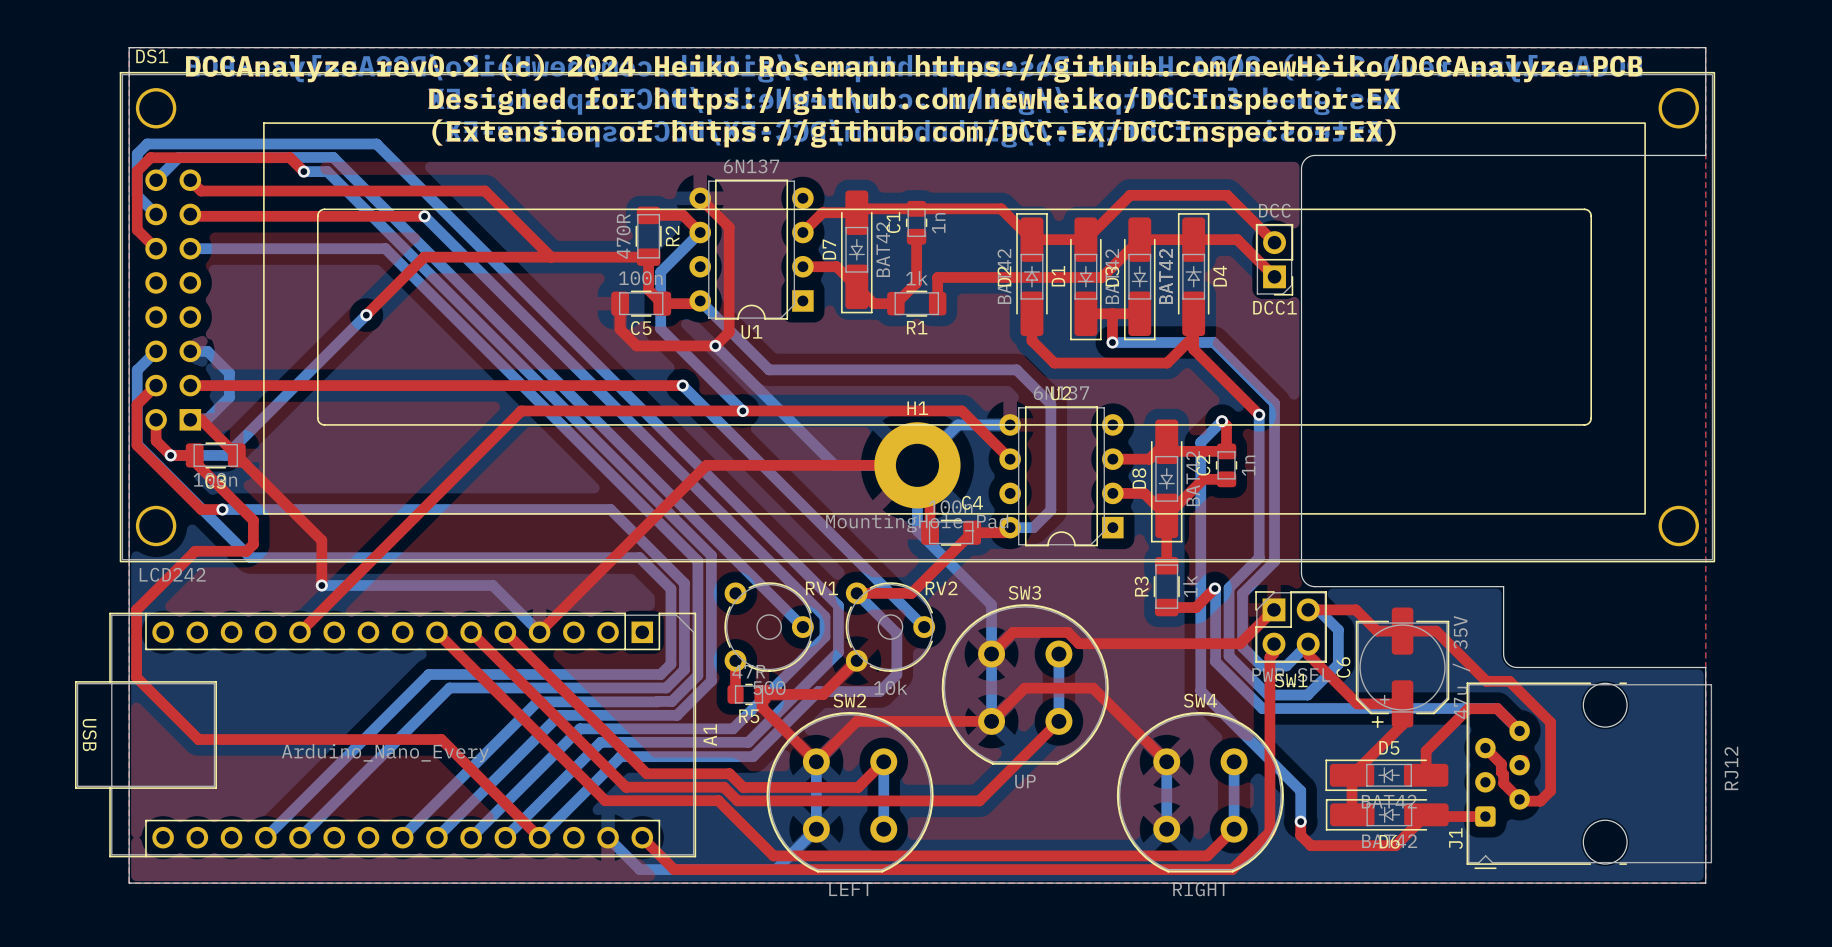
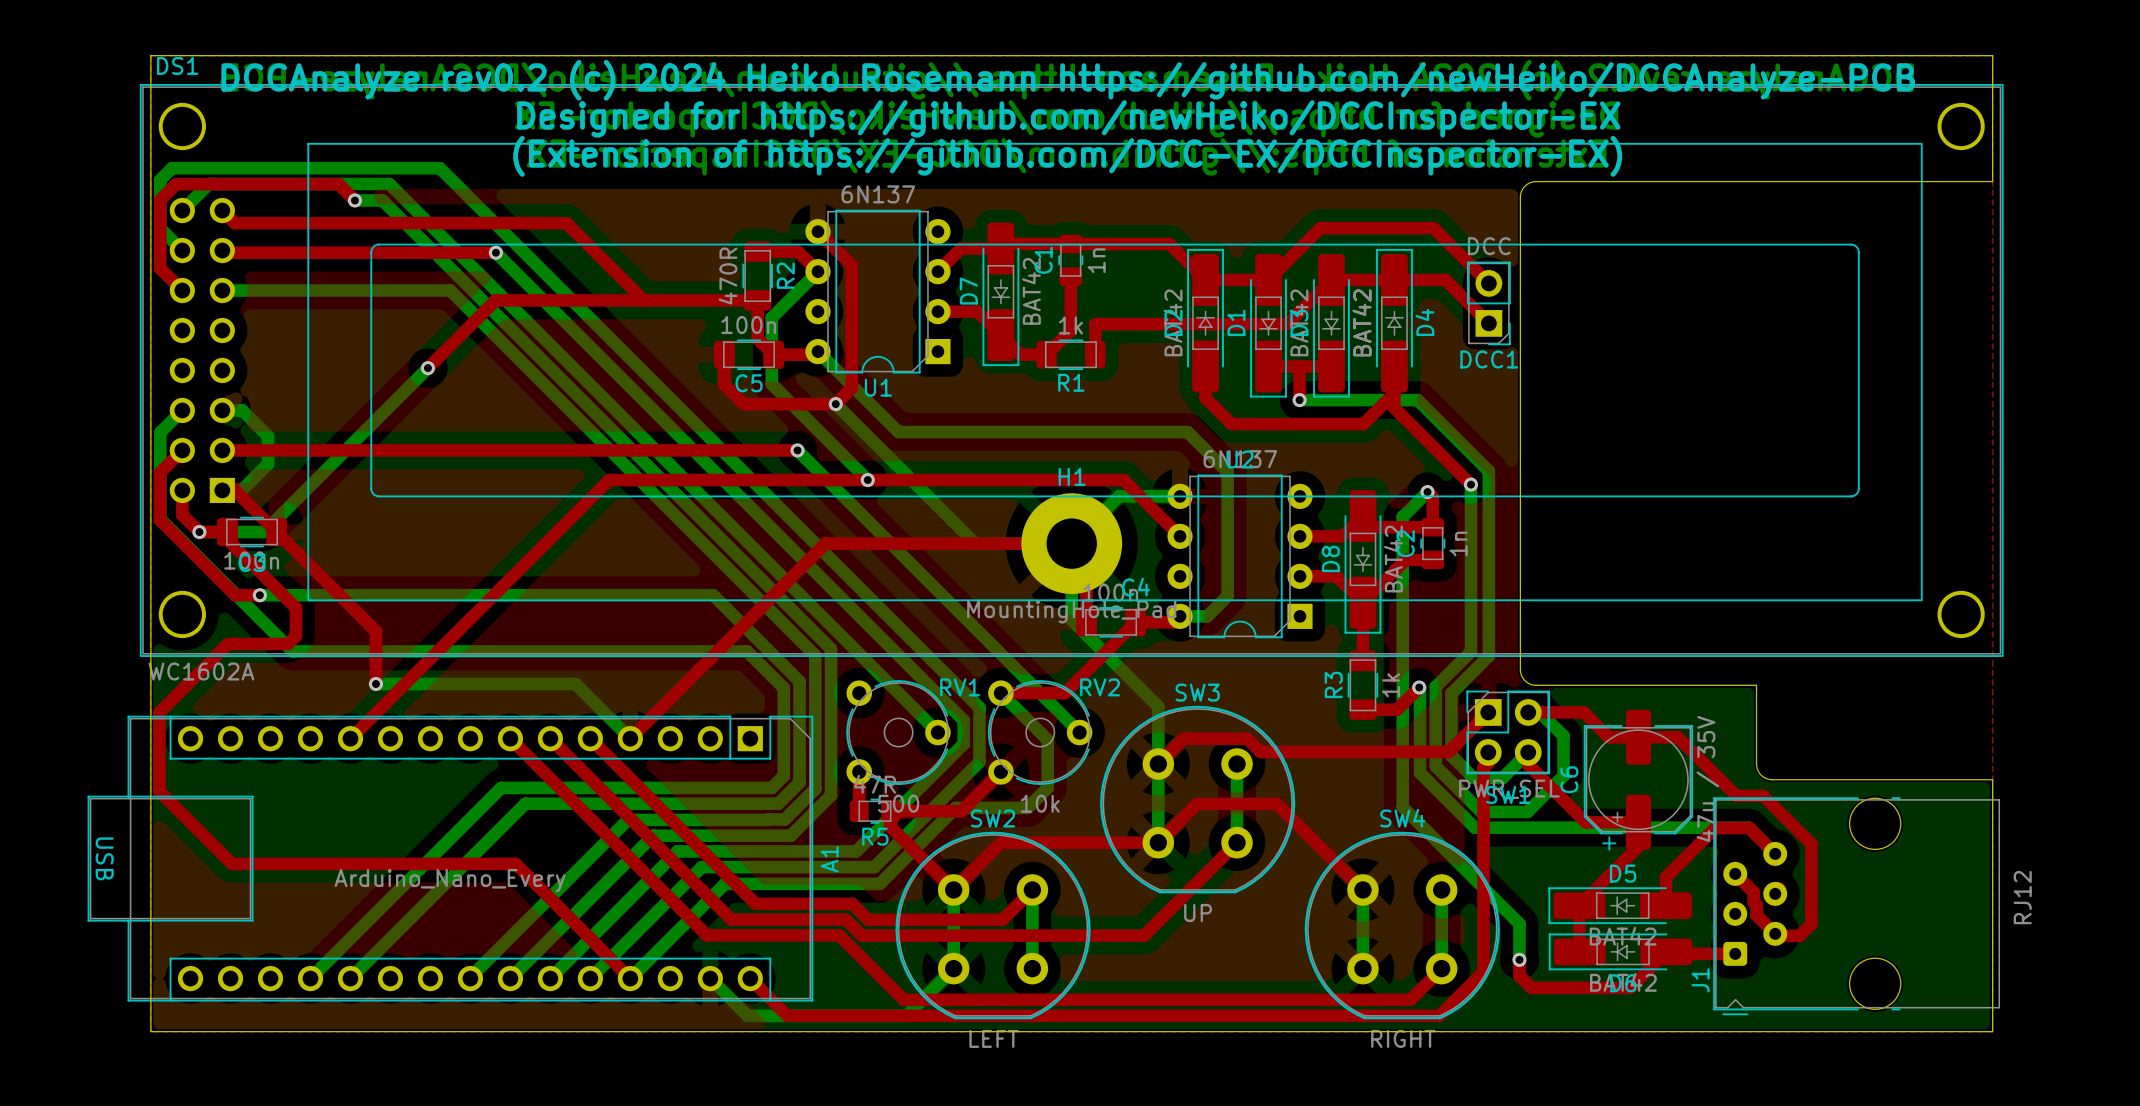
DS1 value: LCD242 (172, 574) -> WC1602A (201, 671)

